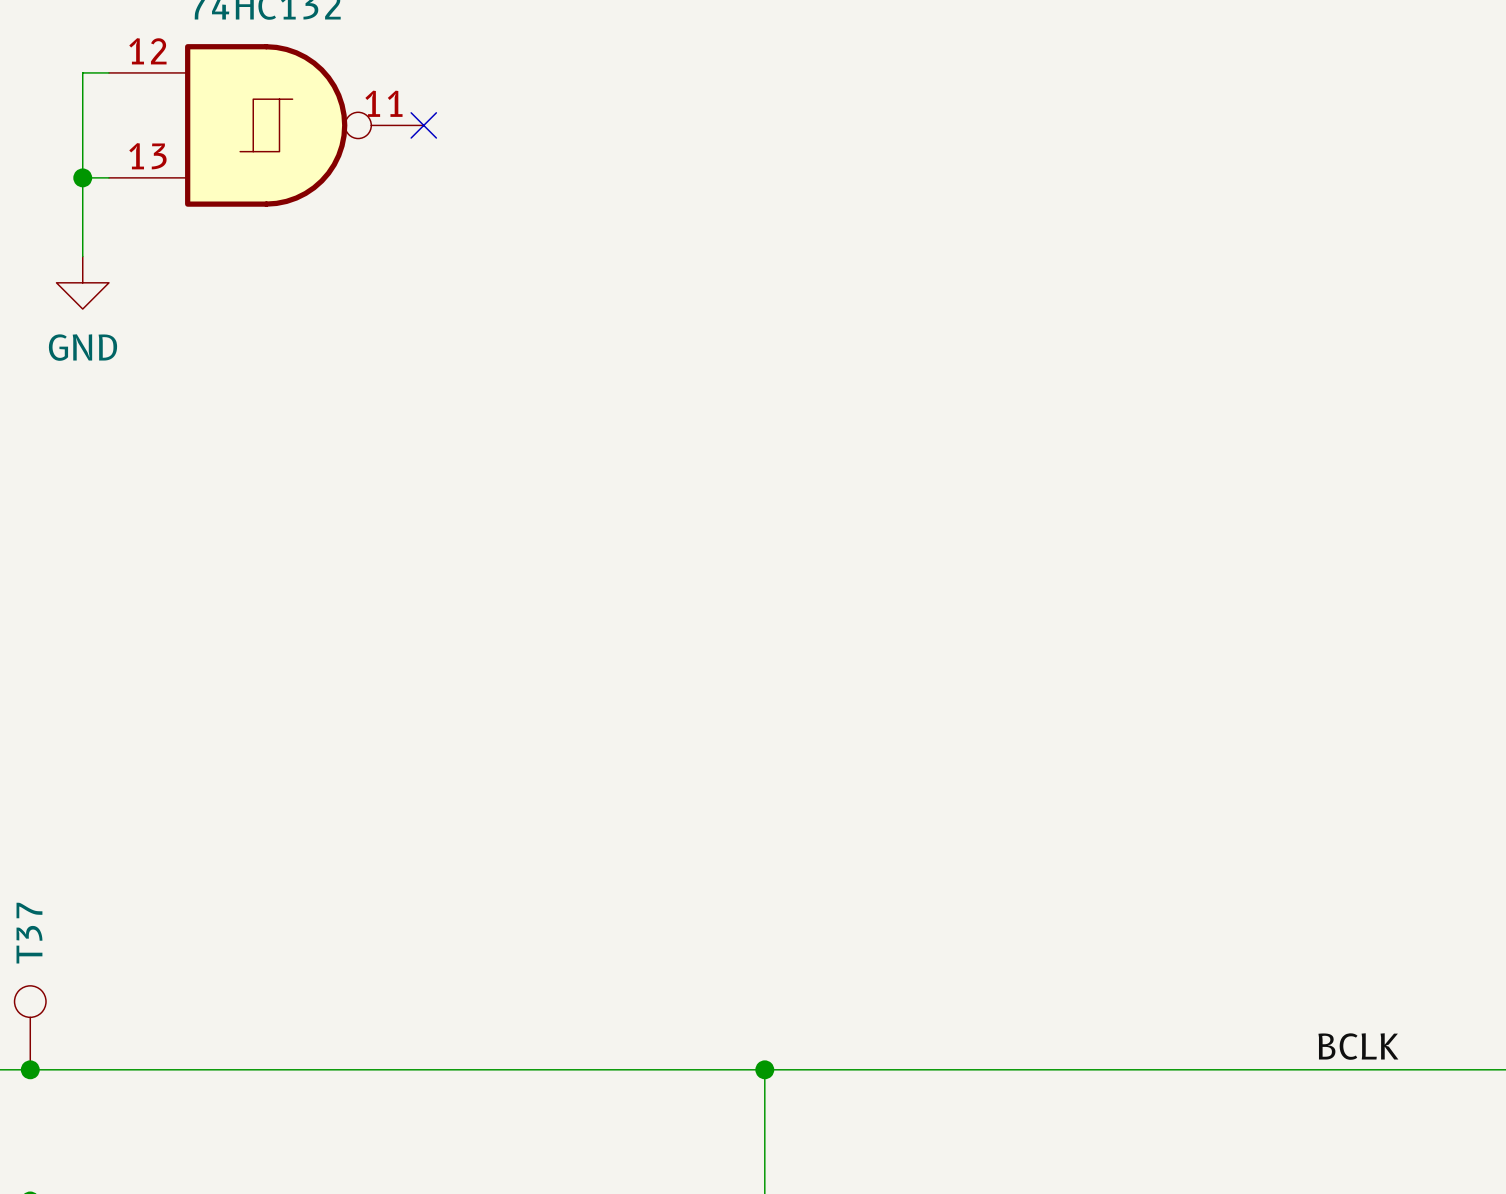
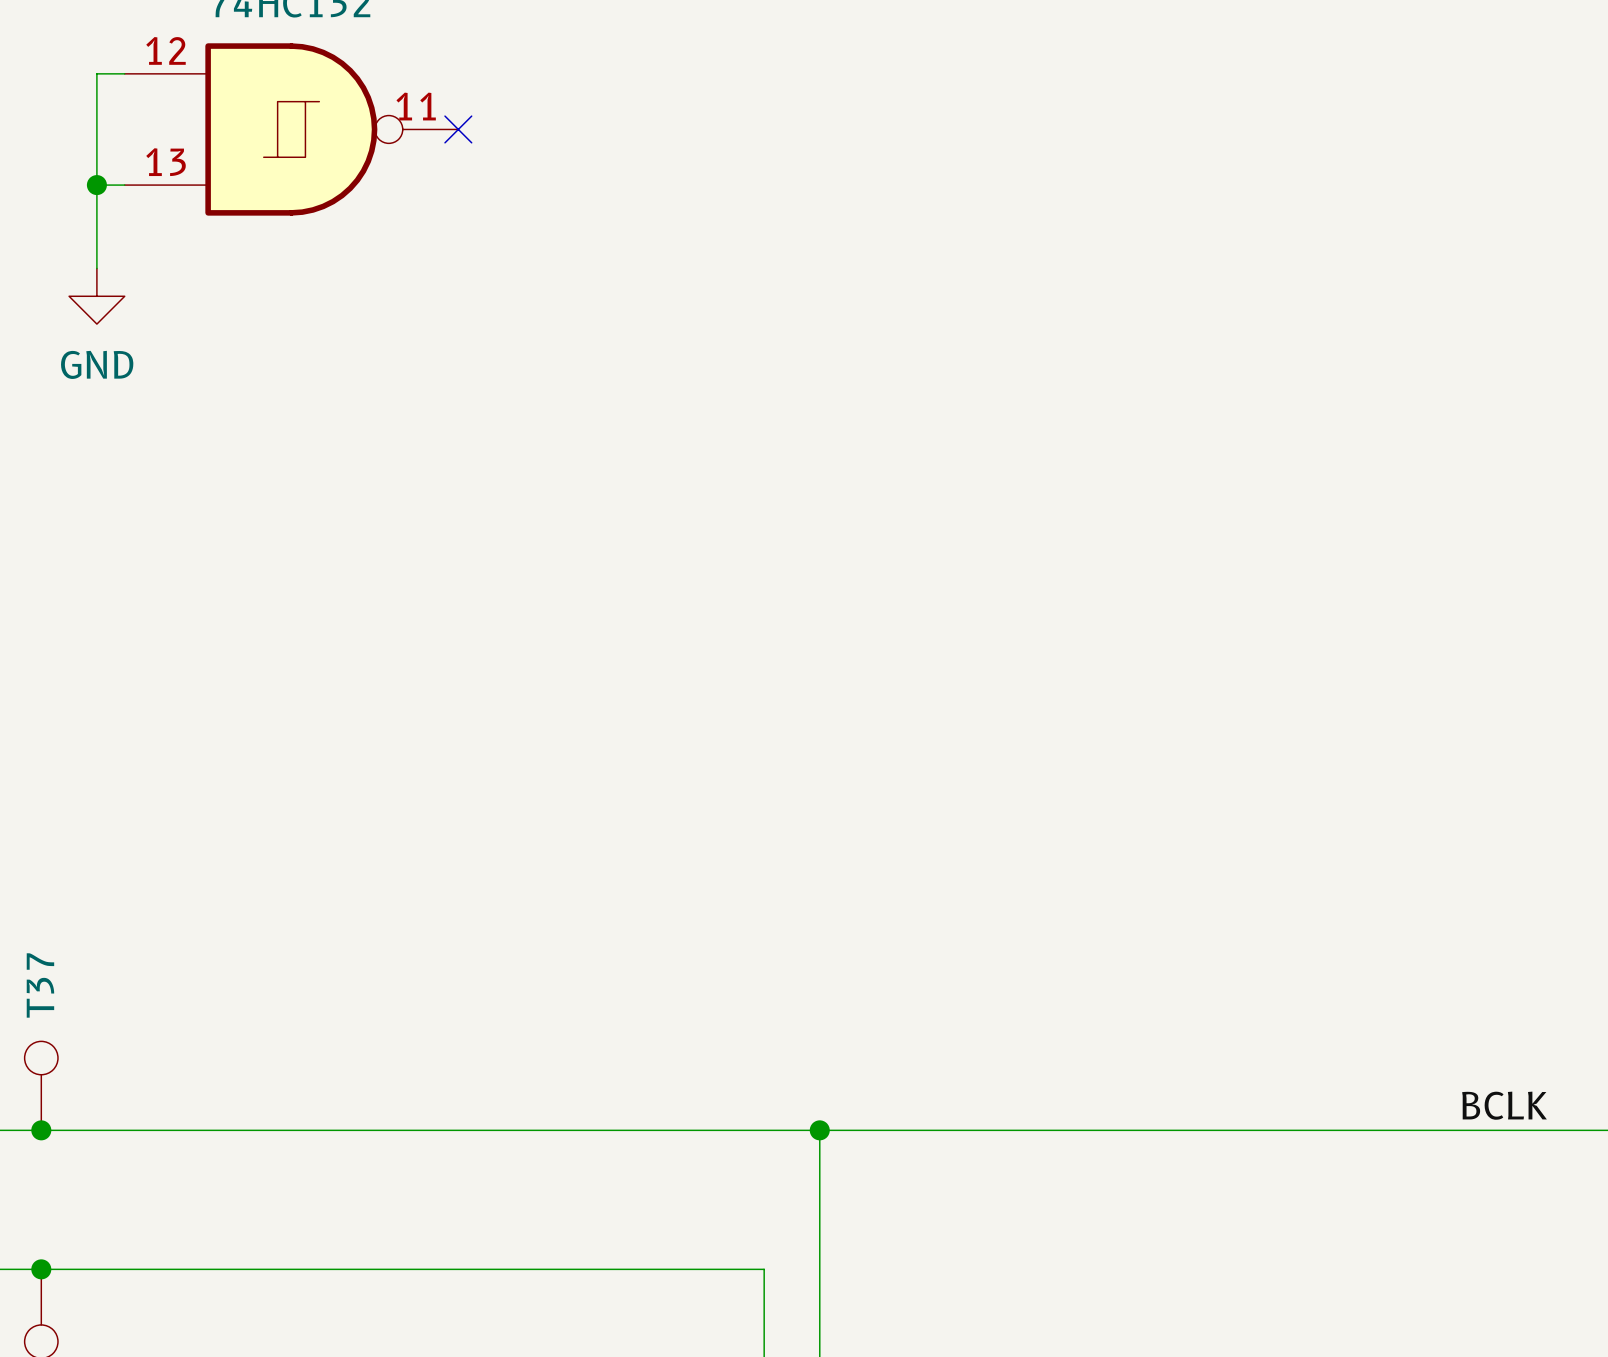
label position: BCLK (1358, 1046) -> BCLK (1504, 1105)

